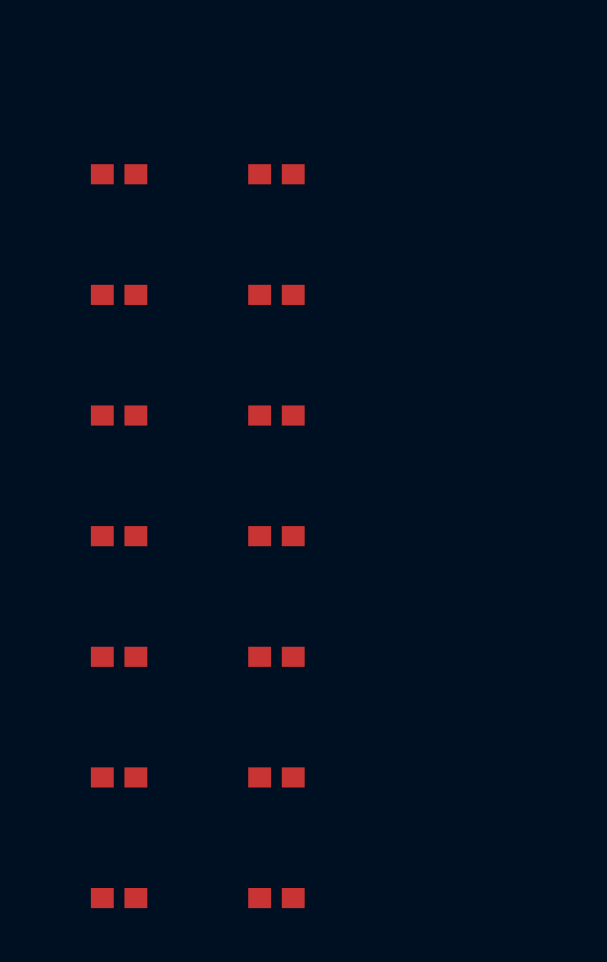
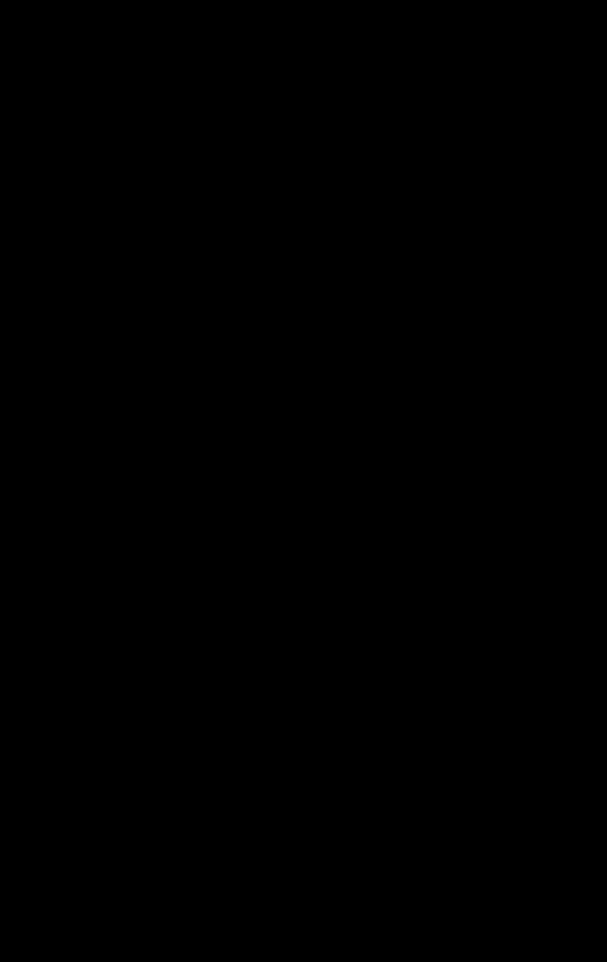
part: (119, 174) -> none
part: (276, 174) -> none
part: (119, 294) -> none
part: (276, 294) -> none
part: (119, 415) -> none
part: (276, 415) -> none
part: (119, 536) -> none
part: (276, 536) -> none
part: (119, 656) -> none
part: (276, 656) -> none
part: (119, 777) -> none
part: (276, 777) -> none
part: (119, 898) -> none
part: (276, 898) -> none

